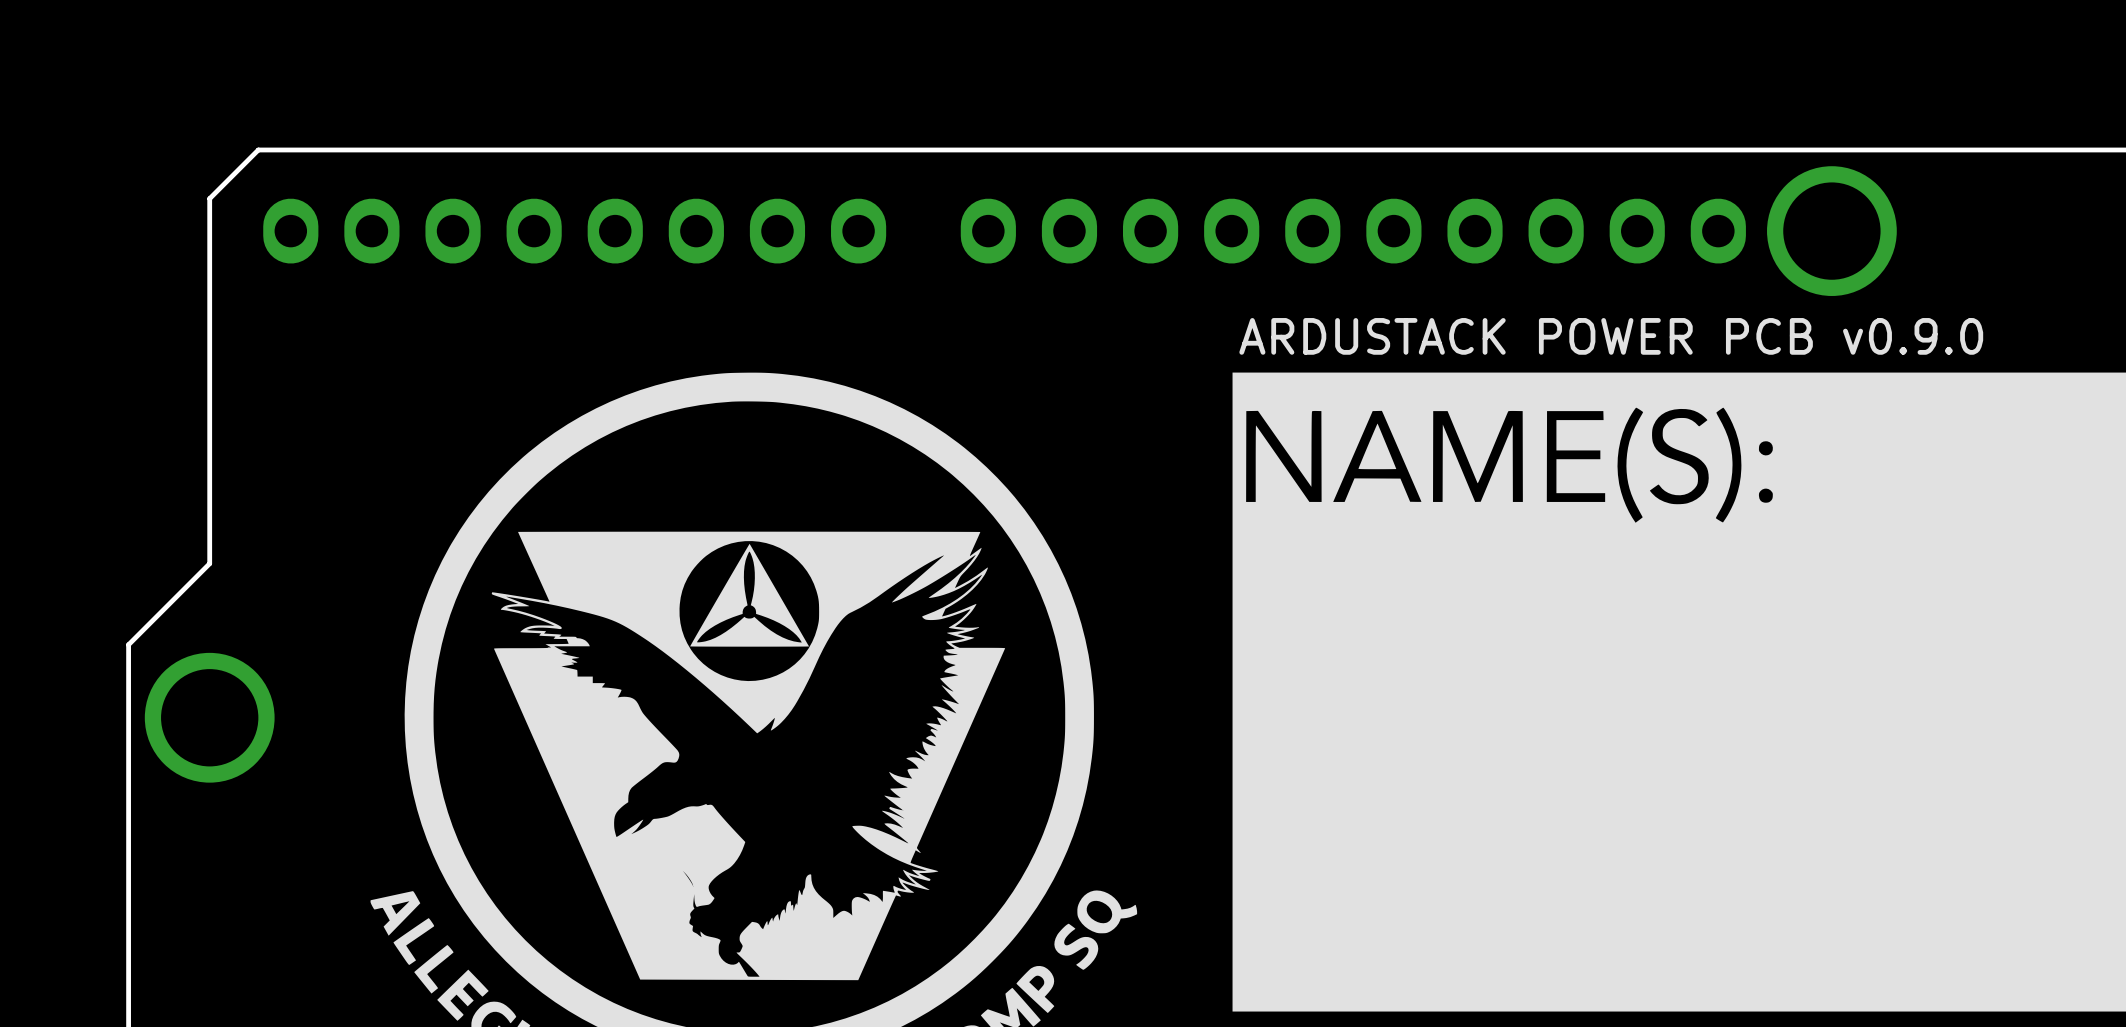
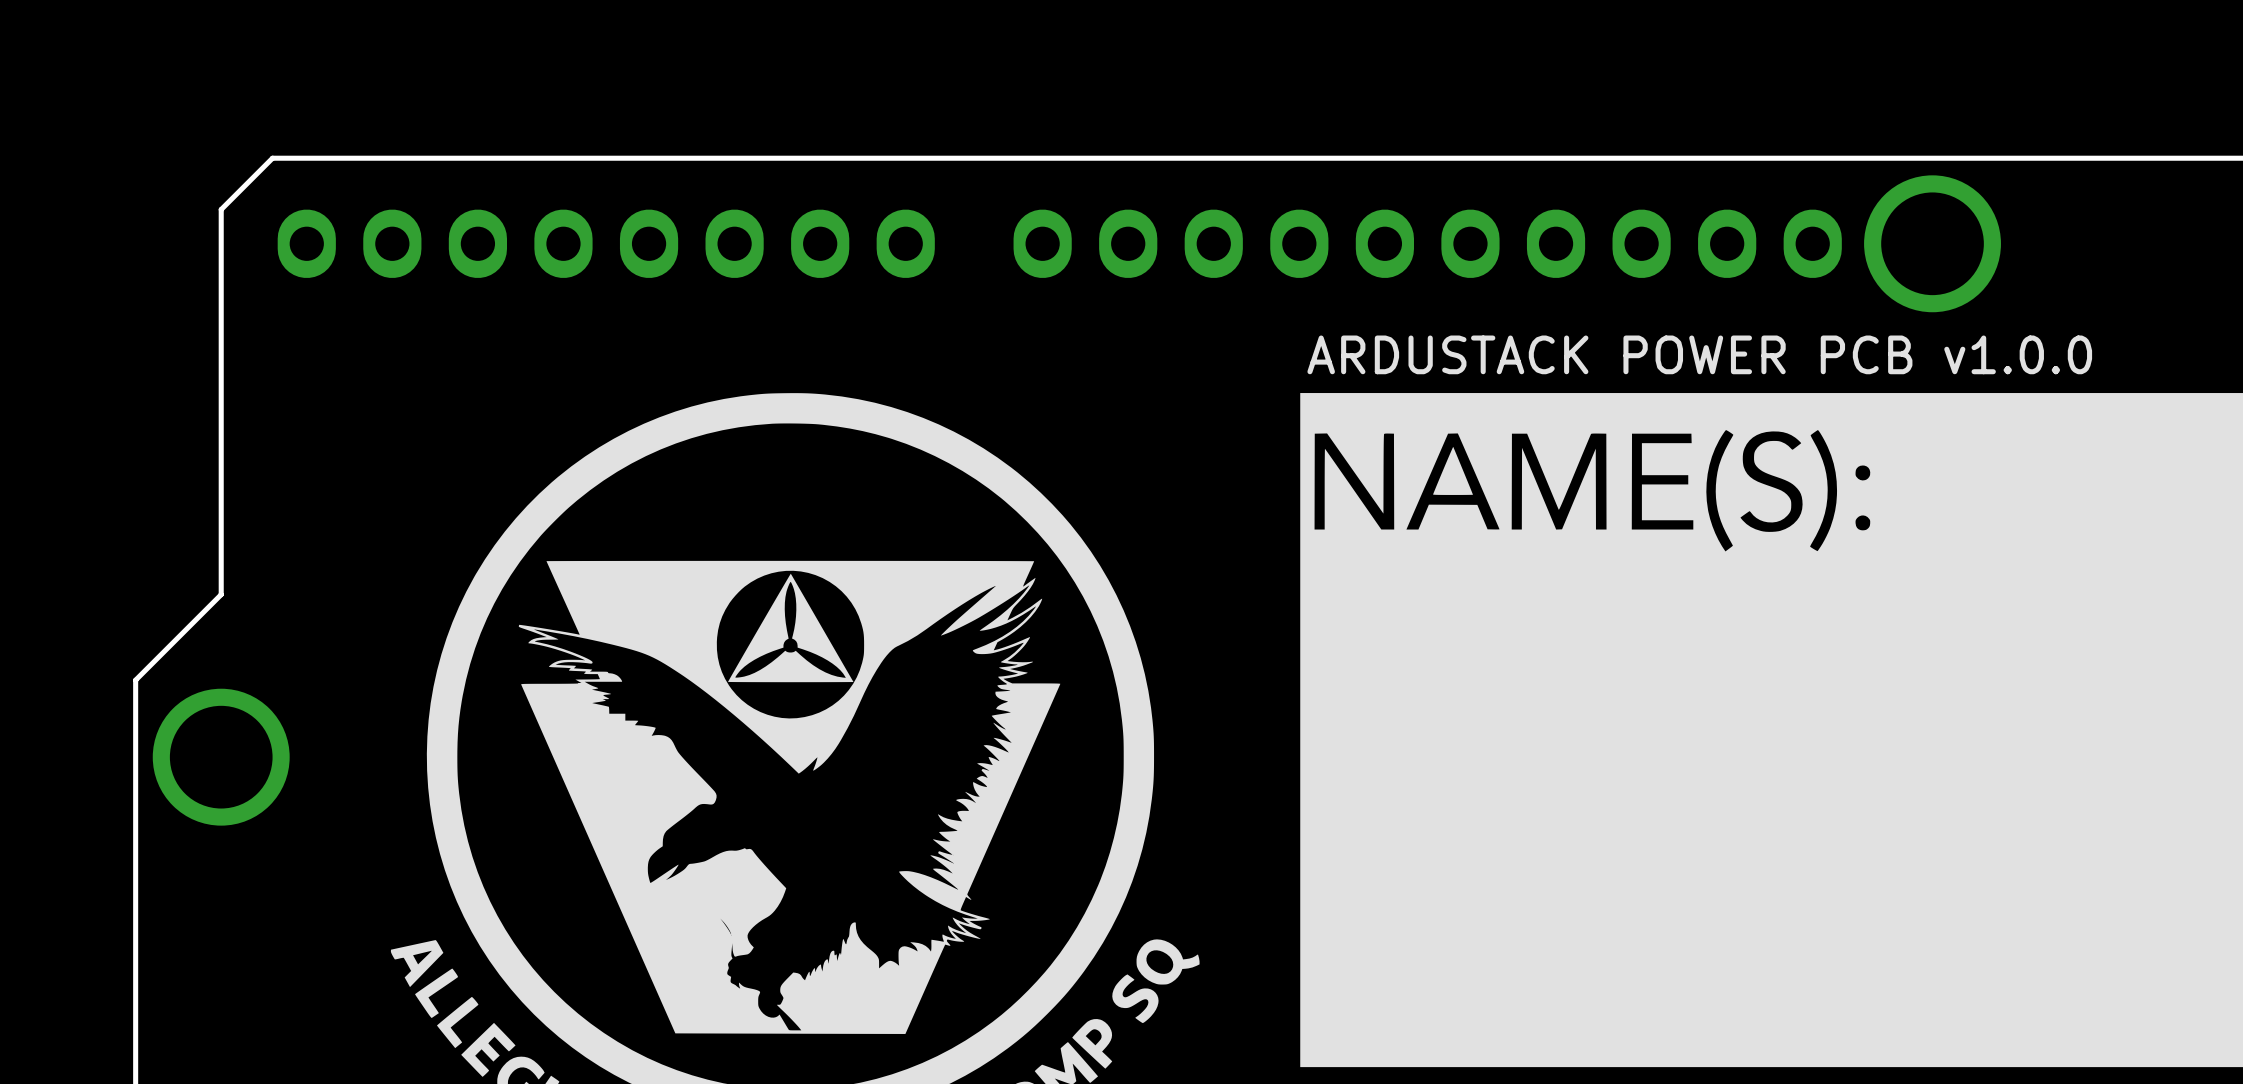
text: ARDUSTACK POWER PCB v0.9.0 (1611, 336) -> ARDUSTACK POWER PCB v1.0.0 (1699, 354)

